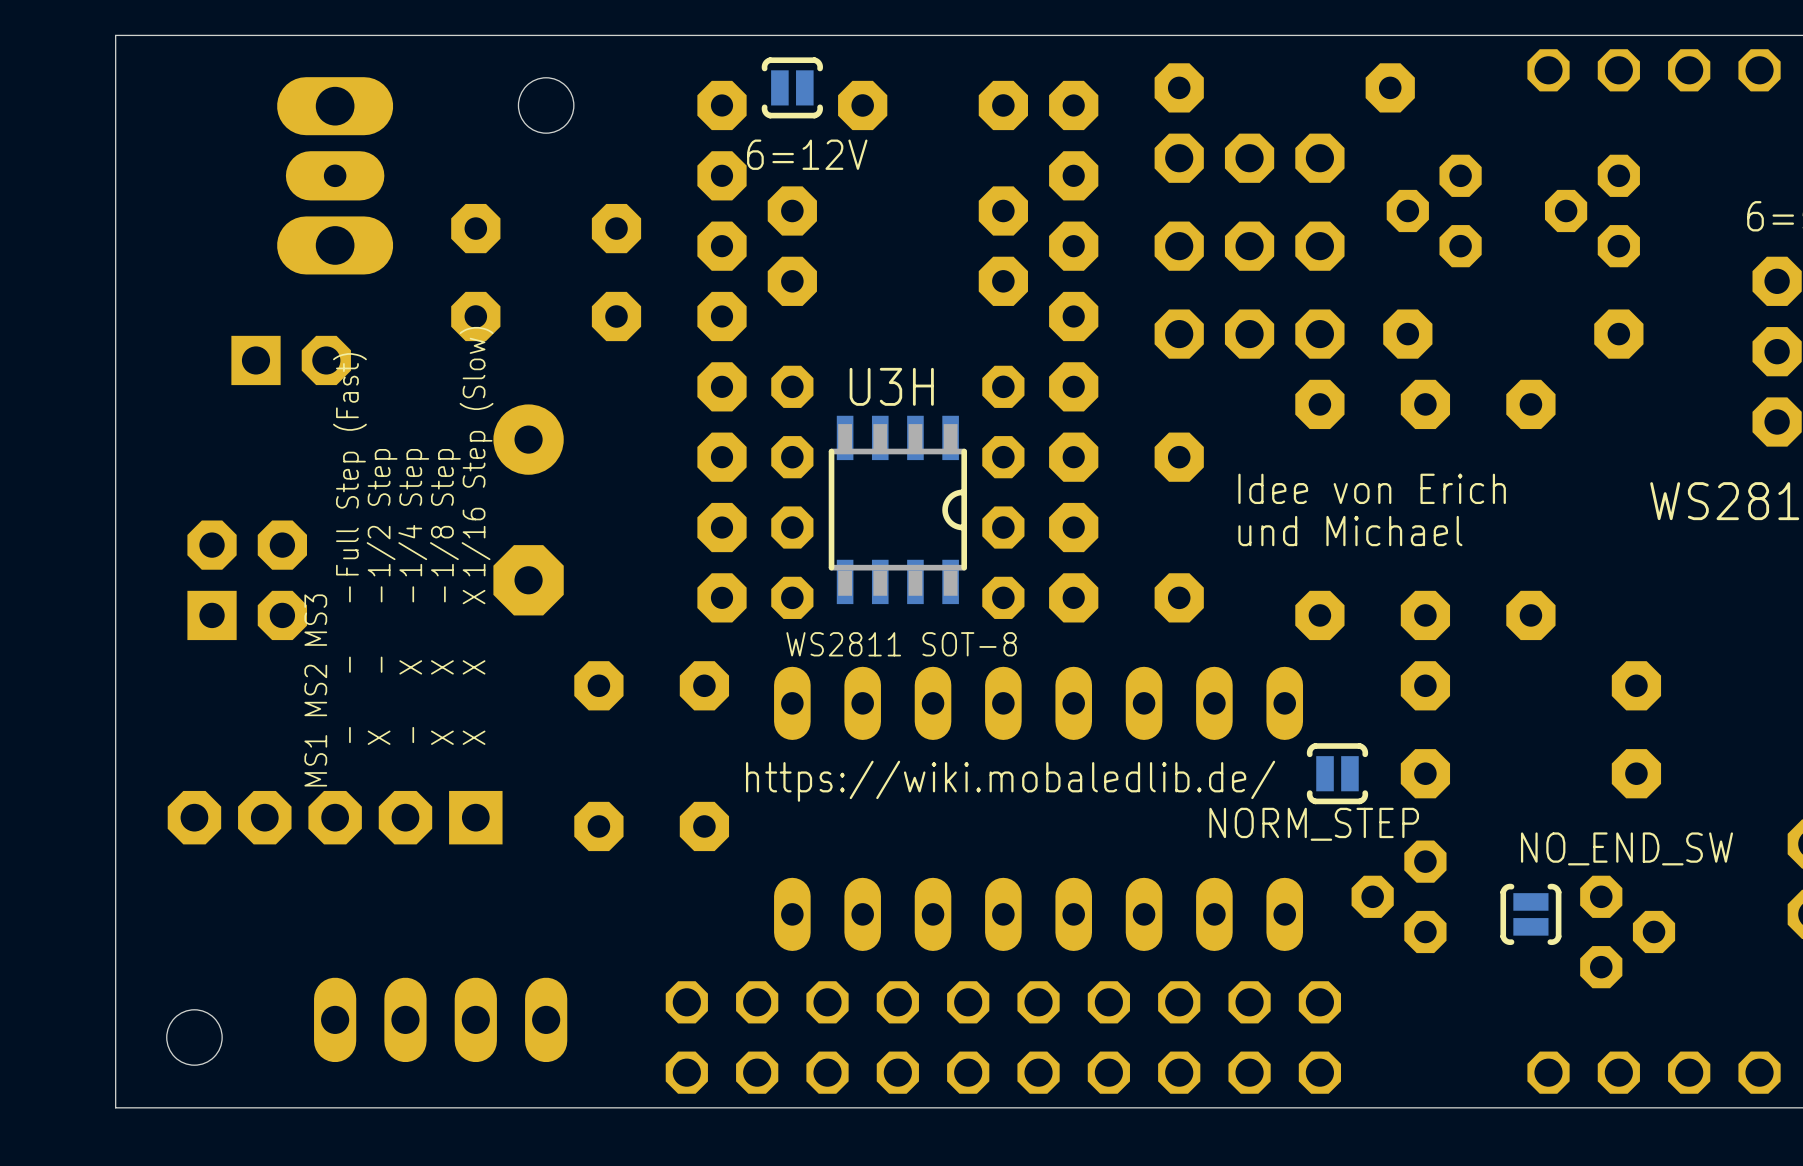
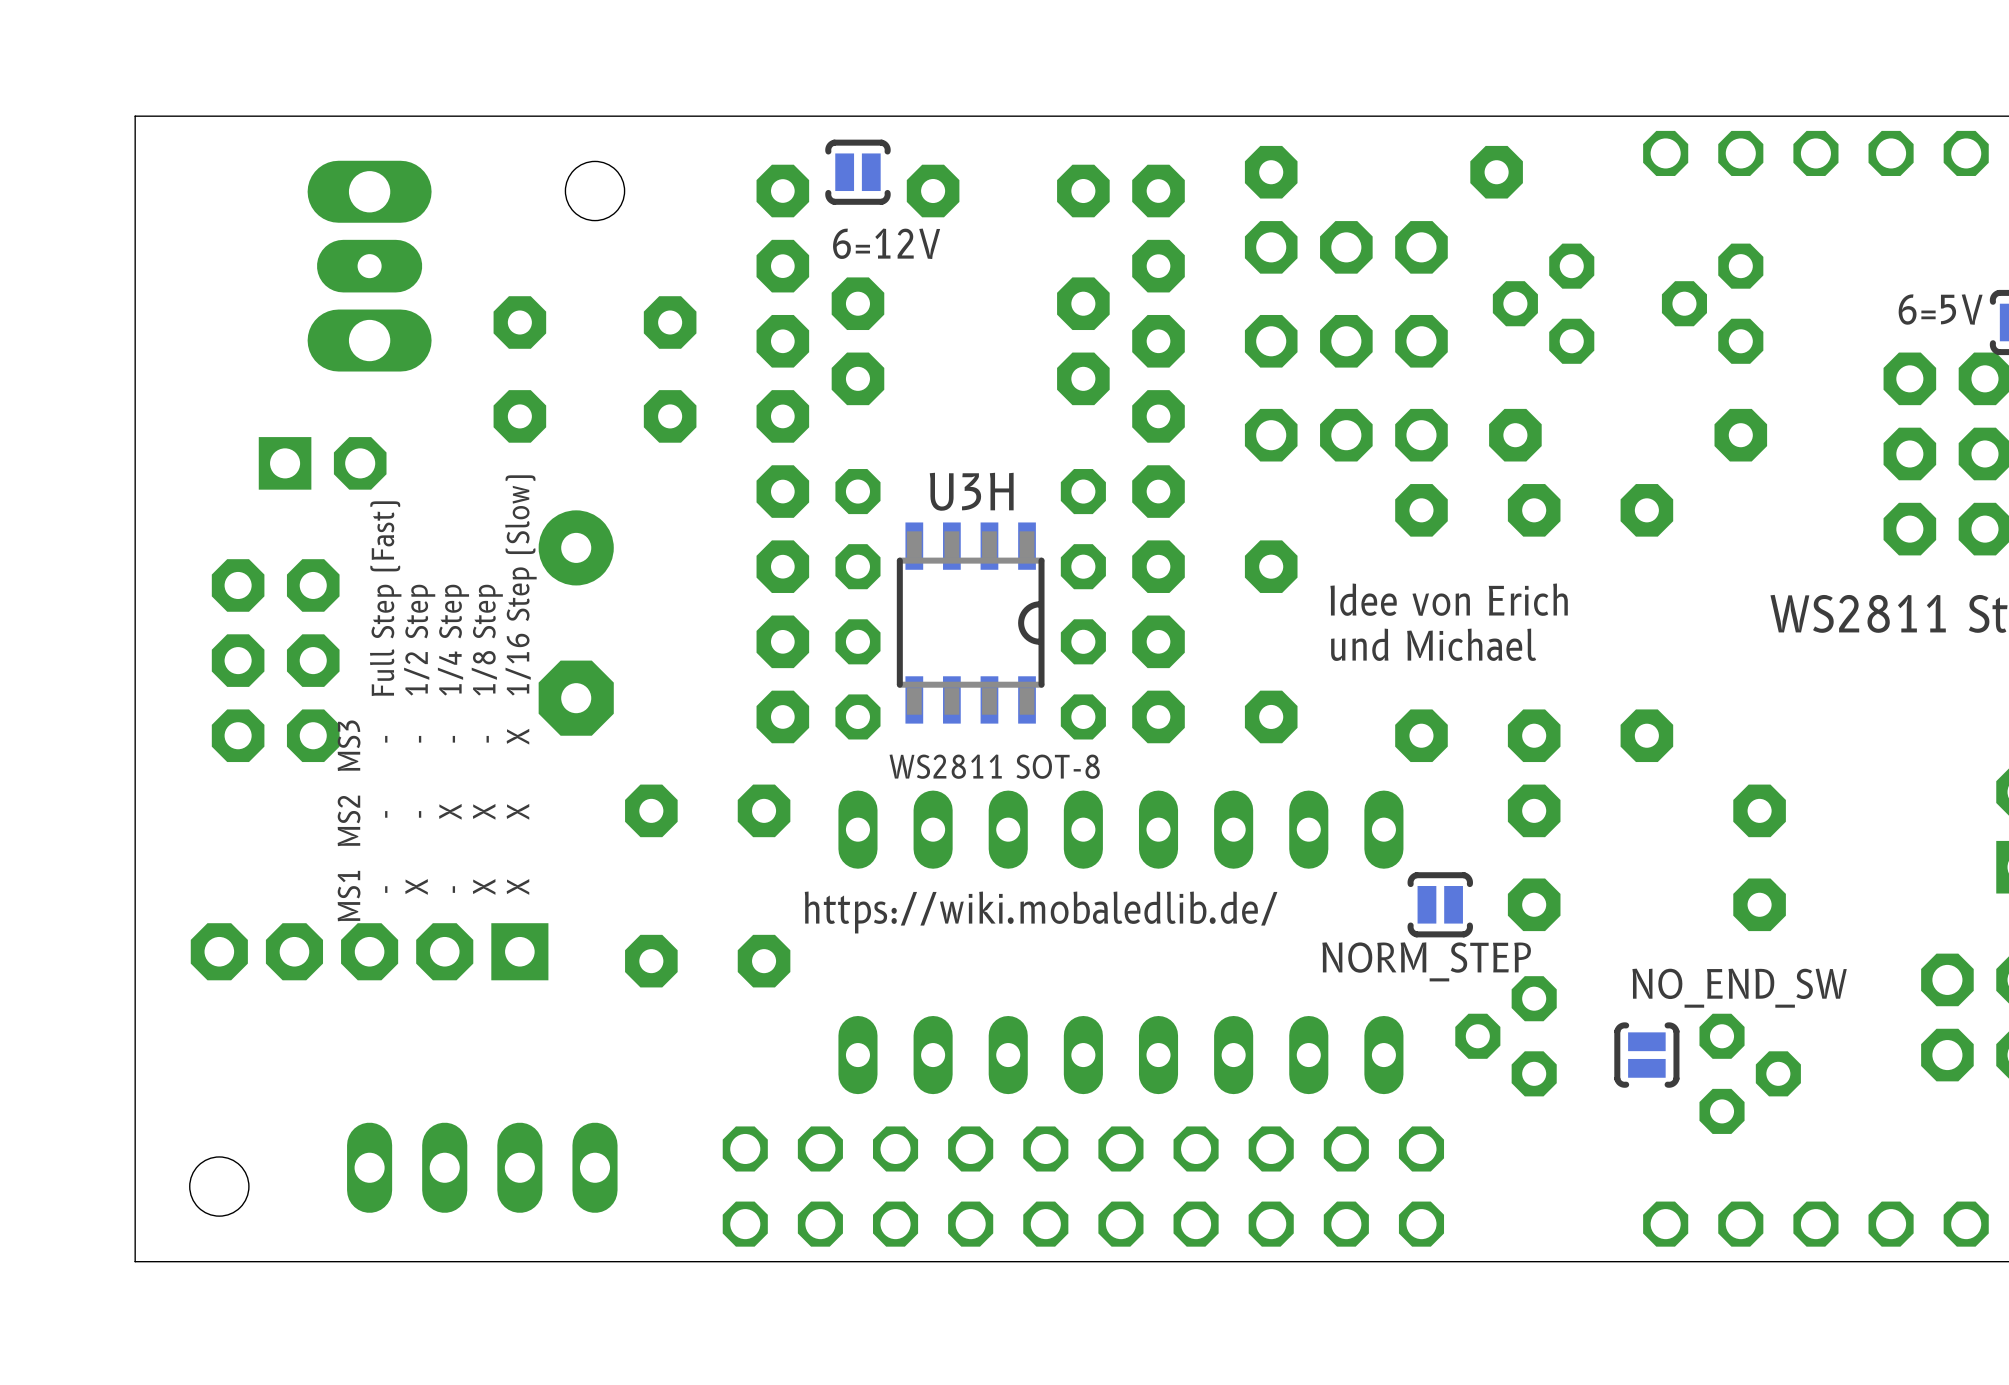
part: none -> (275, 660)
part: (247, 580) -> none

